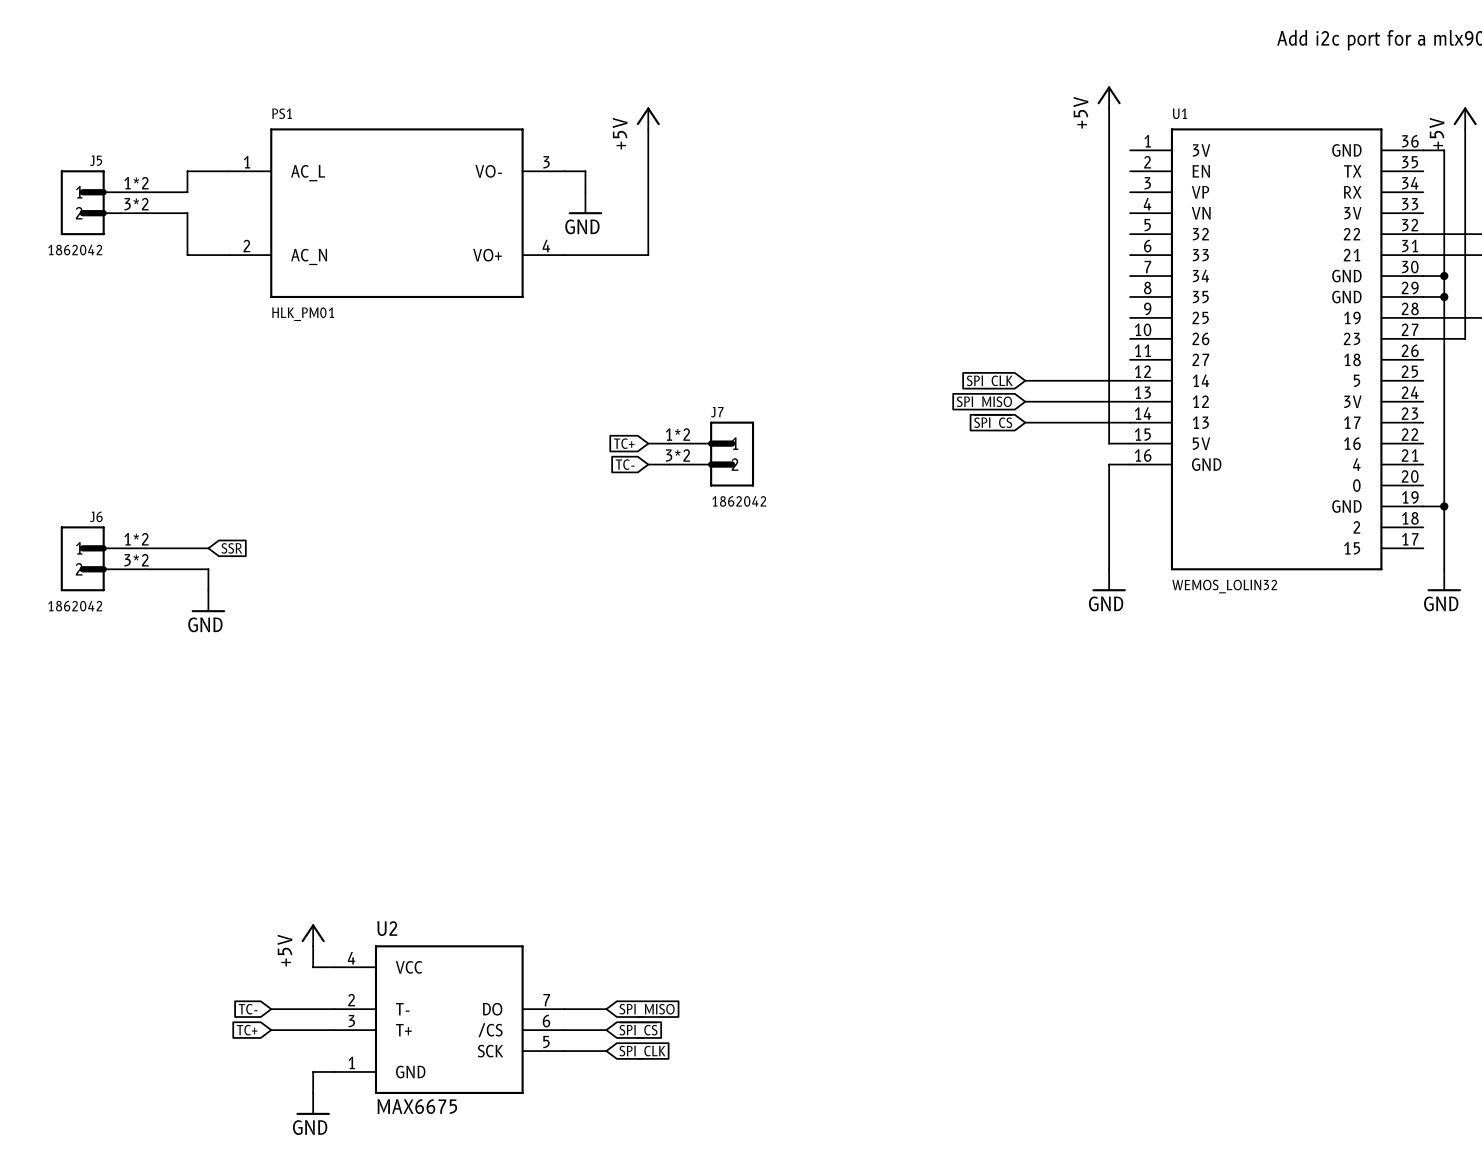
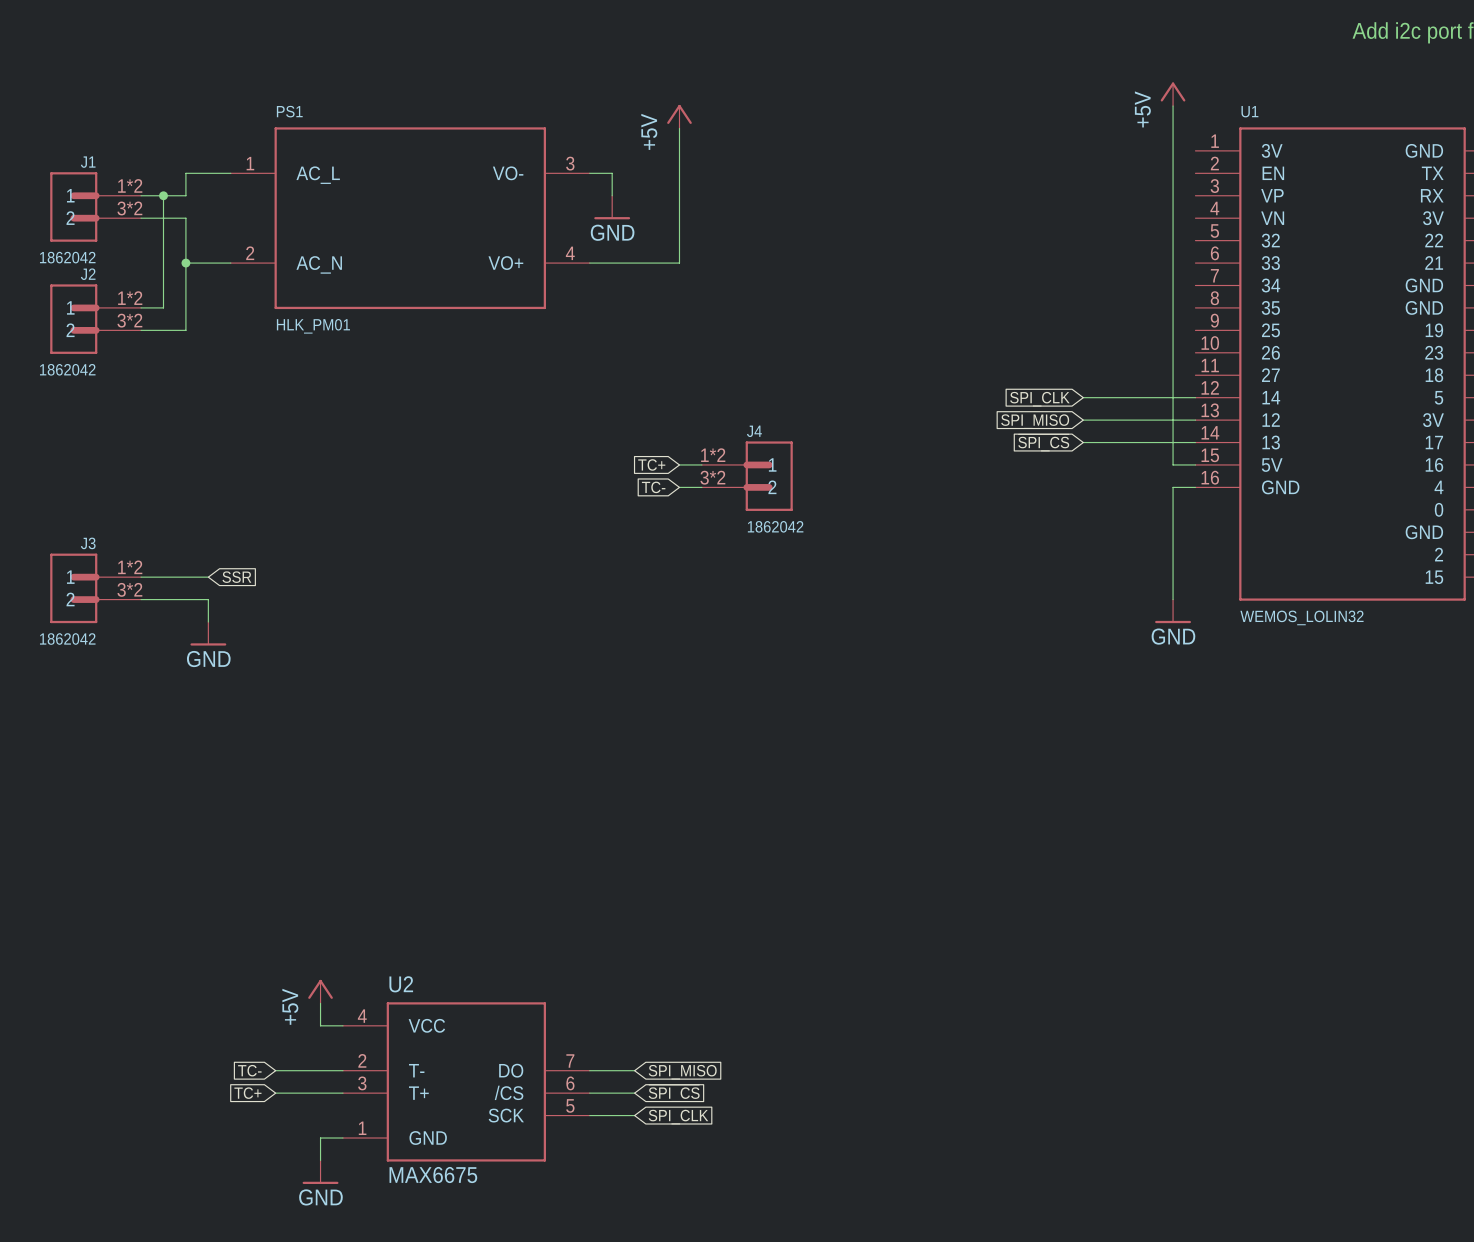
J5 name: J5 (96, 160) -> J1 (88, 162)
wire: none -> (163, 195) (163, 307) (141, 307)
junction: none -> (163, 195)
wire: none -> (185, 263) (185, 330) (141, 330)
junction: none -> (185, 263)
J2: none -> 1862042 (95, 319)
J7 name: J7 (717, 412) -> J4 (754, 431)
J6 name: J6 (96, 516) -> J3 (88, 543)

